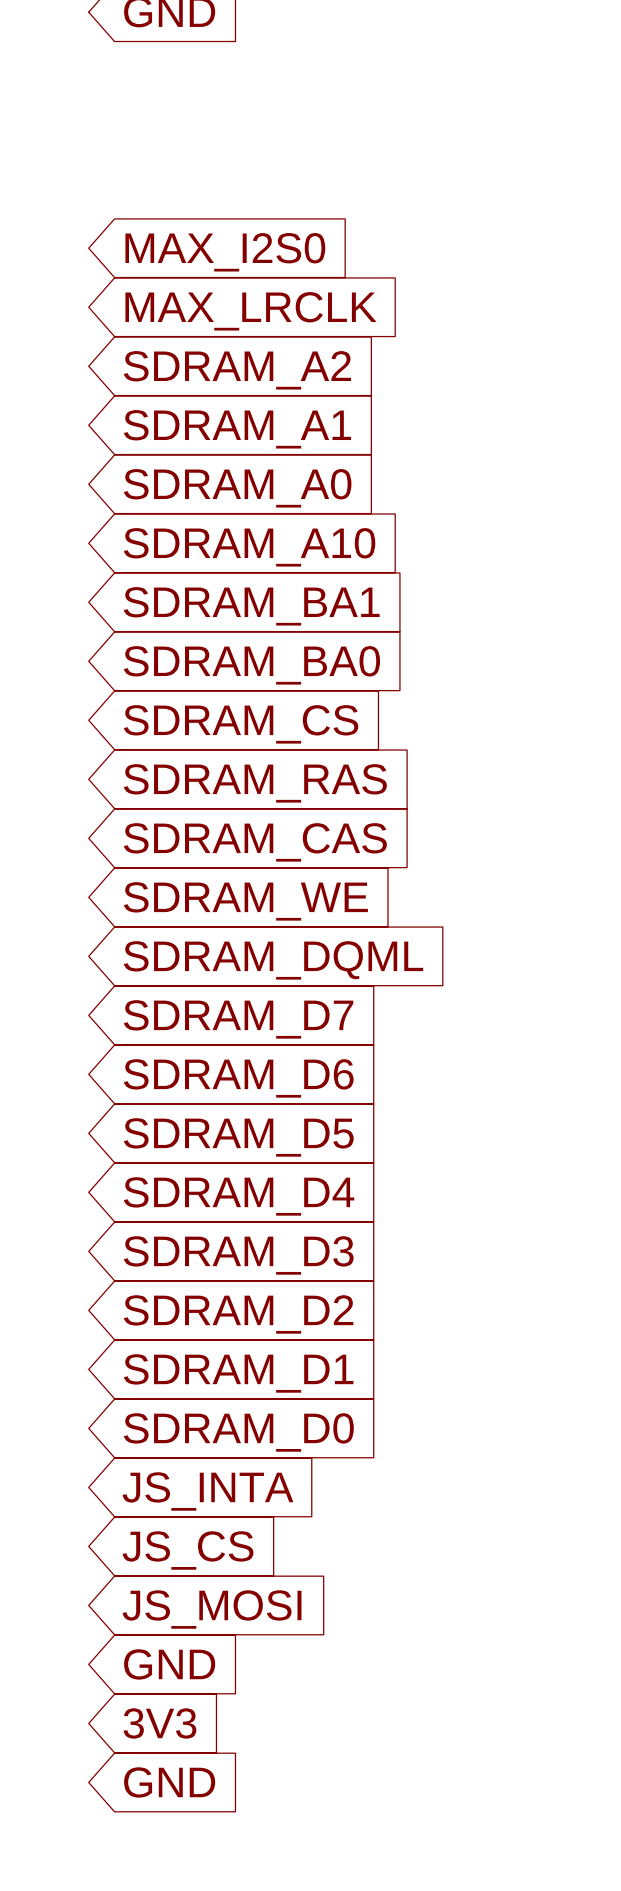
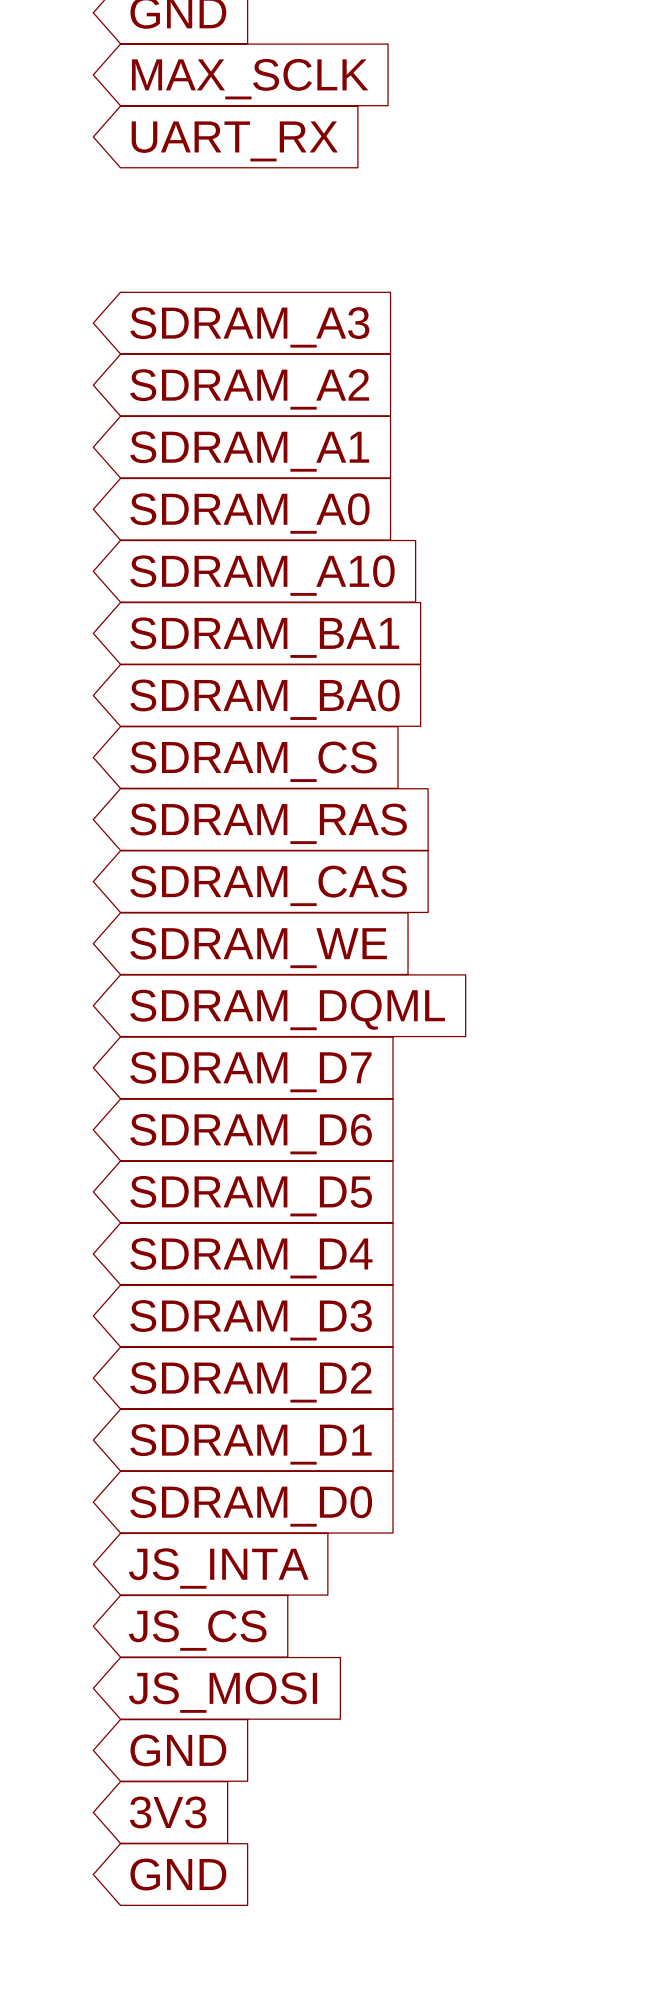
global label: none -> MAX_SCLK (250, 79)
global label: none -> UART_RX (234, 141)
global label: MAX_I2S0 (225, 252) -> none
global label: MAX_LRCLK (250, 311) -> SDRAM_A3 (249, 327)

